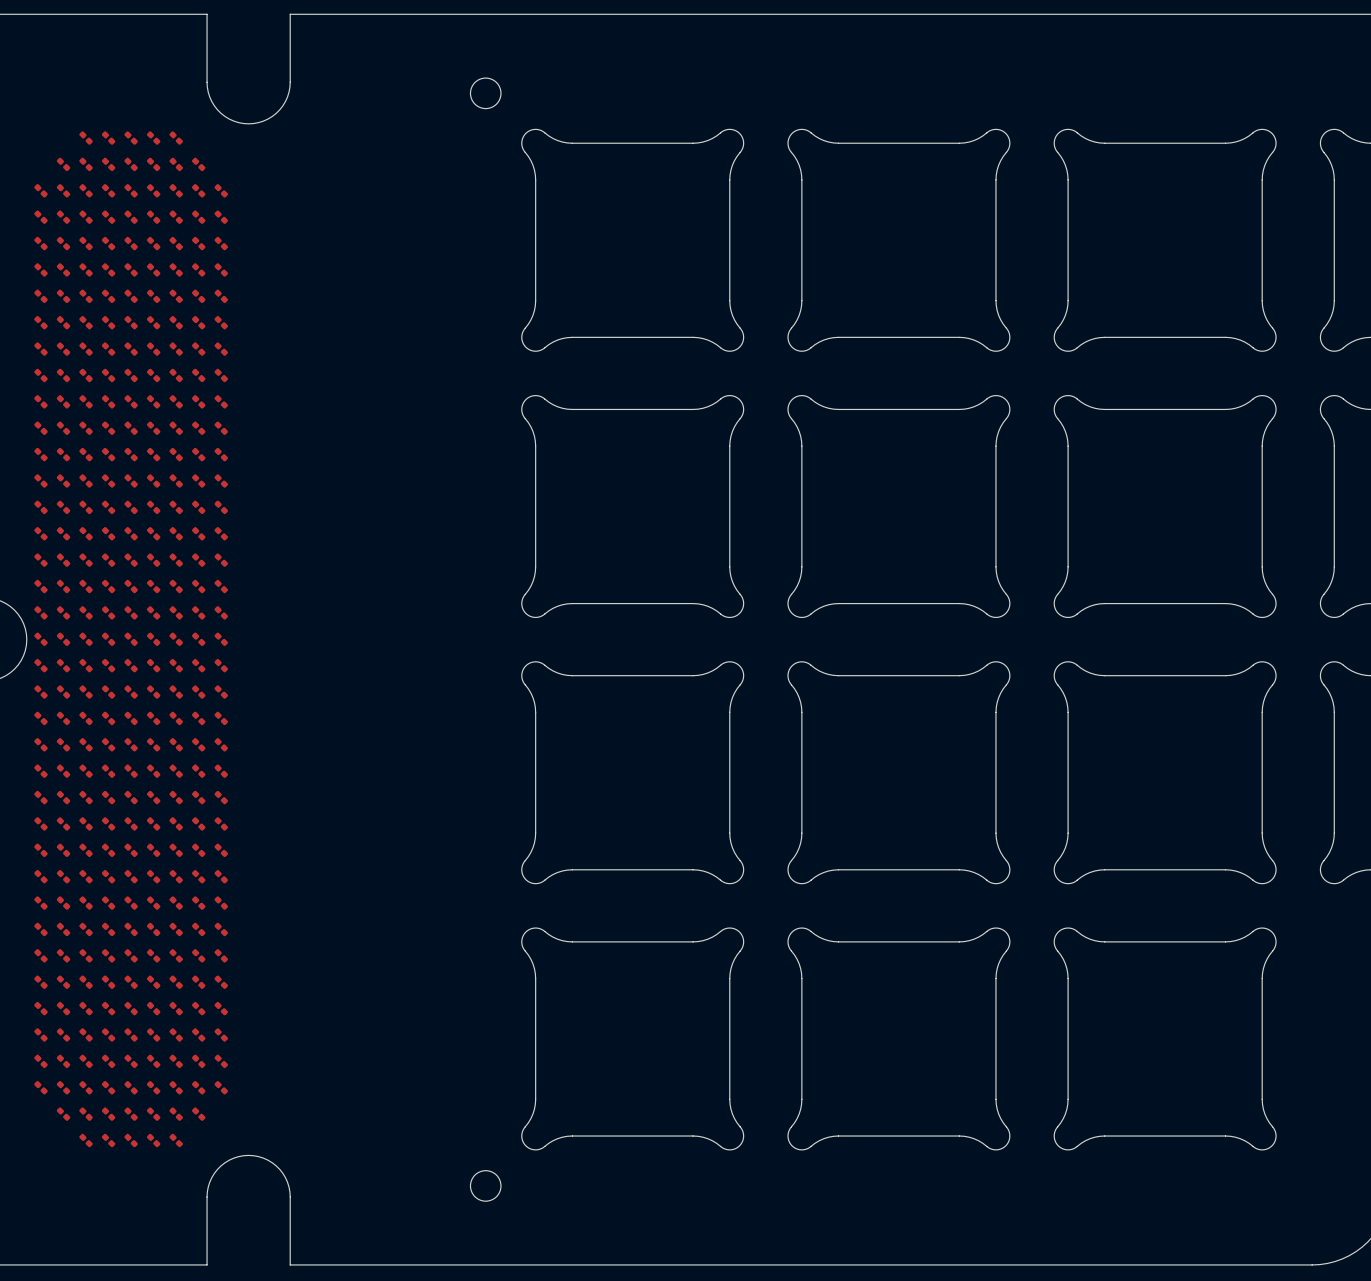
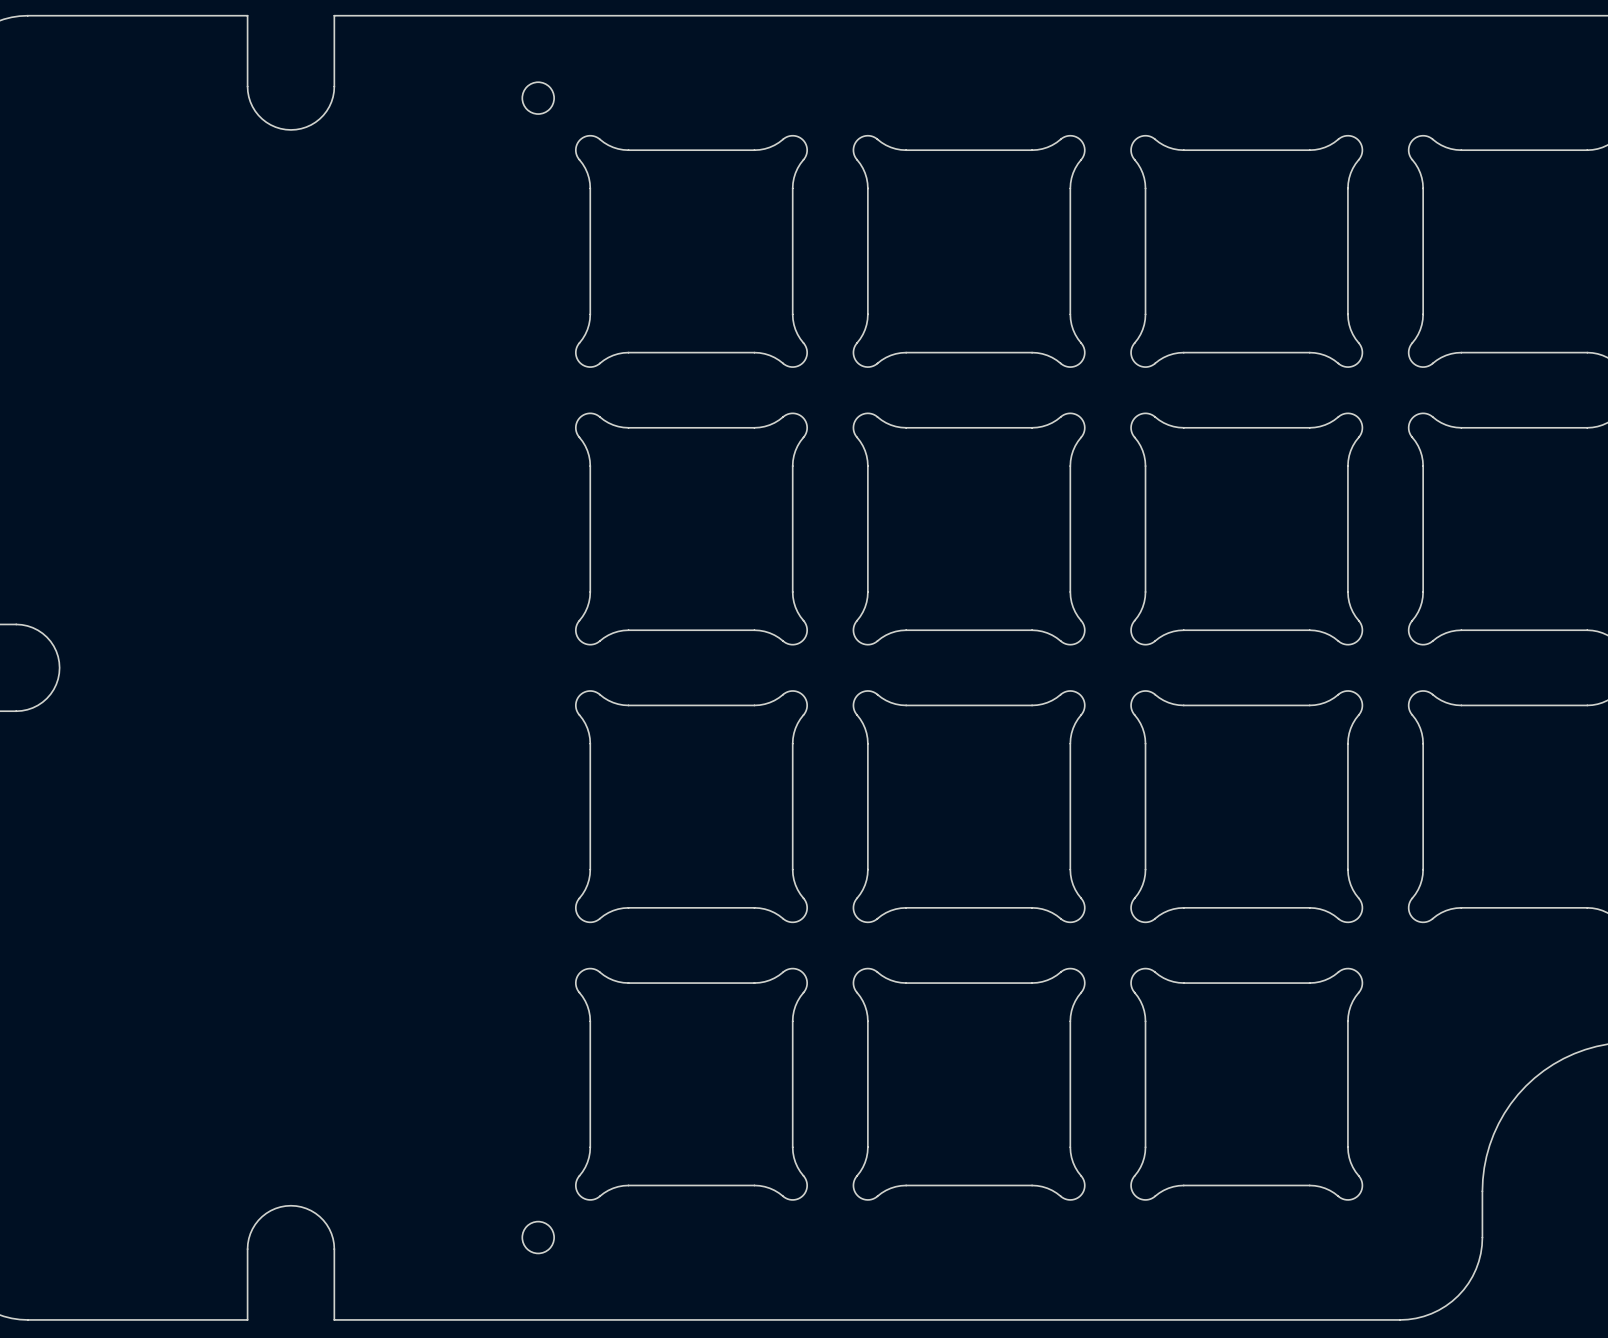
part: (86, 138) -> none
part: (108, 138) -> none
part: (131, 138) -> none
part: (153, 138) -> none
part: (176, 138) -> none
part: (63, 164) -> none
part: (86, 164) -> none
part: (108, 164) -> none
part: (131, 164) -> none
part: (153, 164) -> none
part: (176, 164) -> none
part: (198, 164) -> none
part: (41, 190) -> none
part: (63, 190) -> none
part: (86, 190) -> none
part: (108, 190) -> none
part: (131, 190) -> none
part: (153, 190) -> none
part: (176, 190) -> none
part: (198, 190) -> none
part: (221, 190) -> none
part: (41, 217) -> none
part: (63, 217) -> none
part: (86, 217) -> none
part: (108, 217) -> none
part: (131, 217) -> none
part: (153, 217) -> none
part: (176, 217) -> none
part: (198, 217) -> none
part: (221, 217) -> none
part: (41, 243) -> none
part: (63, 243) -> none
part: (86, 243) -> none
part: (108, 243) -> none
part: (131, 243) -> none
part: (153, 243) -> none
part: (176, 243) -> none
part: (198, 243) -> none
part: (221, 243) -> none
part: (41, 269) -> none
part: (63, 269) -> none
part: (86, 269) -> none
part: (108, 269) -> none
part: (131, 269) -> none
part: (153, 269) -> none
part: (176, 269) -> none
part: (198, 269) -> none
part: (221, 269) -> none
part: (41, 296) -> none
part: (63, 296) -> none
part: (86, 296) -> none
part: (108, 296) -> none
part: (131, 296) -> none
part: (153, 296) -> none
part: (176, 296) -> none
part: (198, 296) -> none
part: (221, 296) -> none
part: (41, 322) -> none
part: (63, 322) -> none
part: (86, 322) -> none
part: (108, 322) -> none
part: (131, 322) -> none
part: (153, 322) -> none
part: (176, 322) -> none
part: (198, 322) -> none
part: (221, 322) -> none
part: (41, 349) -> none
part: (63, 349) -> none
part: (86, 349) -> none
part: (108, 349) -> none
part: (131, 349) -> none
part: (153, 349) -> none
part: (176, 349) -> none
part: (198, 349) -> none
part: (221, 349) -> none
part: (41, 375) -> none
part: (63, 375) -> none
part: (86, 375) -> none
part: (108, 375) -> none
part: (131, 375) -> none
part: (153, 375) -> none
part: (176, 375) -> none
part: (198, 375) -> none
part: (221, 375) -> none
part: (41, 401) -> none
part: (63, 401) -> none
part: (86, 401) -> none
part: (108, 401) -> none
part: (131, 401) -> none
part: (153, 401) -> none
part: (176, 401) -> none
part: (198, 401) -> none
part: (221, 401) -> none
part: (41, 428) -> none
part: (63, 428) -> none
part: (86, 428) -> none
part: (108, 428) -> none
part: (131, 428) -> none
part: (153, 428) -> none
part: (176, 428) -> none
part: (198, 428) -> none
part: (221, 428) -> none
part: (41, 454) -> none
part: (63, 454) -> none
part: (86, 454) -> none
part: (108, 454) -> none
part: (131, 454) -> none
part: (153, 454) -> none
part: (176, 454) -> none
part: (198, 454) -> none
part: (221, 454) -> none
part: (41, 480) -> none
part: (63, 480) -> none
part: (86, 480) -> none
part: (108, 480) -> none
part: (131, 480) -> none
part: (153, 480) -> none
part: (176, 480) -> none
part: (198, 480) -> none
part: (221, 480) -> none
part: (41, 507) -> none
part: (63, 507) -> none
part: (86, 507) -> none
part: (108, 507) -> none
part: (131, 507) -> none
part: (153, 507) -> none
part: (176, 507) -> none
part: (198, 507) -> none
part: (221, 507) -> none
part: (41, 533) -> none
part: (63, 533) -> none
part: (86, 533) -> none
part: (108, 533) -> none
part: (131, 533) -> none
part: (153, 533) -> none
part: (176, 533) -> none
part: (198, 533) -> none
part: (221, 533) -> none
part: (41, 560) -> none
part: (63, 560) -> none
part: (86, 560) -> none
part: (108, 560) -> none
part: (131, 560) -> none
part: (153, 560) -> none
part: (176, 560) -> none
part: (198, 560) -> none
part: (221, 560) -> none
part: (41, 586) -> none
part: (63, 586) -> none
part: (86, 586) -> none
part: (108, 586) -> none
part: (131, 586) -> none
part: (153, 586) -> none
part: (176, 586) -> none
part: (198, 586) -> none
part: (221, 586) -> none
part: (41, 612) -> none
part: (63, 612) -> none
part: (86, 612) -> none
part: (108, 612) -> none
part: (131, 612) -> none
part: (153, 612) -> none
part: (176, 612) -> none
part: (198, 612) -> none
part: (221, 612) -> none
part: (41, 639) -> none
part: (63, 639) -> none
part: (86, 639) -> none
part: (108, 639) -> none
part: (131, 639) -> none
part: (153, 639) -> none
part: (176, 639) -> none
part: (198, 639) -> none
part: (221, 639) -> none
part: (41, 665) -> none
part: (63, 665) -> none
part: (86, 665) -> none
part: (108, 665) -> none
part: (131, 665) -> none
part: (153, 665) -> none
part: (176, 665) -> none
part: (198, 665) -> none
part: (221, 665) -> none
part: (41, 692) -> none
part: (63, 692) -> none
part: (86, 692) -> none
part: (108, 692) -> none
part: (131, 692) -> none
part: (153, 692) -> none
part: (176, 692) -> none
part: (198, 692) -> none
part: (221, 692) -> none
part: (41, 718) -> none
part: (63, 718) -> none
part: (86, 718) -> none
part: (108, 718) -> none
part: (131, 718) -> none
part: (153, 718) -> none
part: (176, 718) -> none
part: (198, 718) -> none
part: (221, 718) -> none
part: (41, 744) -> none
part: (63, 744) -> none
part: (86, 744) -> none
part: (108, 744) -> none
part: (131, 744) -> none
part: (153, 744) -> none
part: (176, 744) -> none
part: (198, 744) -> none
part: (221, 744) -> none
part: (41, 771) -> none
part: (63, 771) -> none
part: (86, 771) -> none
part: (108, 771) -> none
part: (131, 771) -> none
part: (153, 771) -> none
part: (176, 771) -> none
part: (198, 771) -> none
part: (221, 771) -> none
part: (41, 797) -> none
part: (63, 797) -> none
part: (86, 797) -> none
part: (108, 797) -> none
part: (131, 797) -> none
part: (153, 797) -> none
part: (176, 797) -> none
part: (198, 797) -> none
part: (221, 797) -> none
part: (41, 823) -> none
part: (63, 823) -> none
part: (86, 823) -> none
part: (108, 823) -> none
part: (131, 823) -> none
part: (153, 823) -> none
part: (176, 823) -> none
part: (198, 823) -> none
part: (221, 823) -> none
part: (41, 850) -> none
part: (63, 850) -> none
part: (86, 850) -> none
part: (108, 850) -> none
part: (131, 850) -> none
part: (153, 850) -> none
part: (176, 850) -> none
part: (198, 850) -> none
part: (221, 850) -> none
part: (41, 876) -> none
part: (63, 876) -> none
part: (86, 876) -> none
part: (108, 876) -> none
part: (131, 876) -> none
part: (153, 876) -> none
part: (176, 876) -> none
part: (198, 876) -> none
part: (221, 876) -> none
part: (41, 903) -> none
part: (63, 903) -> none
part: (86, 903) -> none
part: (108, 903) -> none
part: (131, 903) -> none
part: (153, 903) -> none
part: (176, 903) -> none
part: (198, 903) -> none
part: (221, 903) -> none
part: (41, 929) -> none
part: (63, 929) -> none
part: (86, 929) -> none
part: (108, 929) -> none
part: (131, 929) -> none
part: (153, 929) -> none
part: (176, 929) -> none
part: (198, 929) -> none
part: (221, 929) -> none
part: (41, 955) -> none
part: (63, 955) -> none
part: (86, 955) -> none
part: (108, 955) -> none
part: (131, 955) -> none
part: (153, 955) -> none
part: (176, 955) -> none
part: (198, 955) -> none
part: (221, 955) -> none
part: (41, 982) -> none
part: (63, 982) -> none
part: (86, 982) -> none
part: (108, 982) -> none
part: (131, 982) -> none
part: (153, 982) -> none
part: (176, 982) -> none
part: (198, 982) -> none
part: (221, 982) -> none
part: (41, 1008) -> none
part: (63, 1008) -> none
part: (86, 1008) -> none
part: (108, 1008) -> none
part: (131, 1008) -> none
part: (153, 1008) -> none
part: (176, 1008) -> none
part: (198, 1008) -> none
part: (221, 1008) -> none
part: (41, 1034) -> none
part: (63, 1034) -> none
part: (86, 1034) -> none
part: (108, 1034) -> none
part: (131, 1034) -> none
part: (153, 1034) -> none
part: (176, 1034) -> none
part: (198, 1034) -> none
part: (221, 1034) -> none
part: (41, 1061) -> none
part: (63, 1061) -> none
part: (86, 1061) -> none
part: (108, 1061) -> none
part: (131, 1061) -> none
part: (153, 1061) -> none
part: (176, 1061) -> none
part: (198, 1061) -> none
part: (221, 1061) -> none
part: (41, 1087) -> none
part: (63, 1087) -> none
part: (86, 1087) -> none
part: (108, 1087) -> none
part: (131, 1087) -> none
part: (153, 1087) -> none
part: (176, 1087) -> none
part: (198, 1087) -> none
part: (221, 1087) -> none
part: (63, 1114) -> none
part: (86, 1114) -> none
part: (108, 1114) -> none
part: (131, 1114) -> none
part: (153, 1114) -> none
part: (176, 1114) -> none
part: (198, 1114) -> none
part: (86, 1140) -> none
part: (108, 1140) -> none
part: (131, 1140) -> none
part: (153, 1140) -> none
part: (176, 1140) -> none

